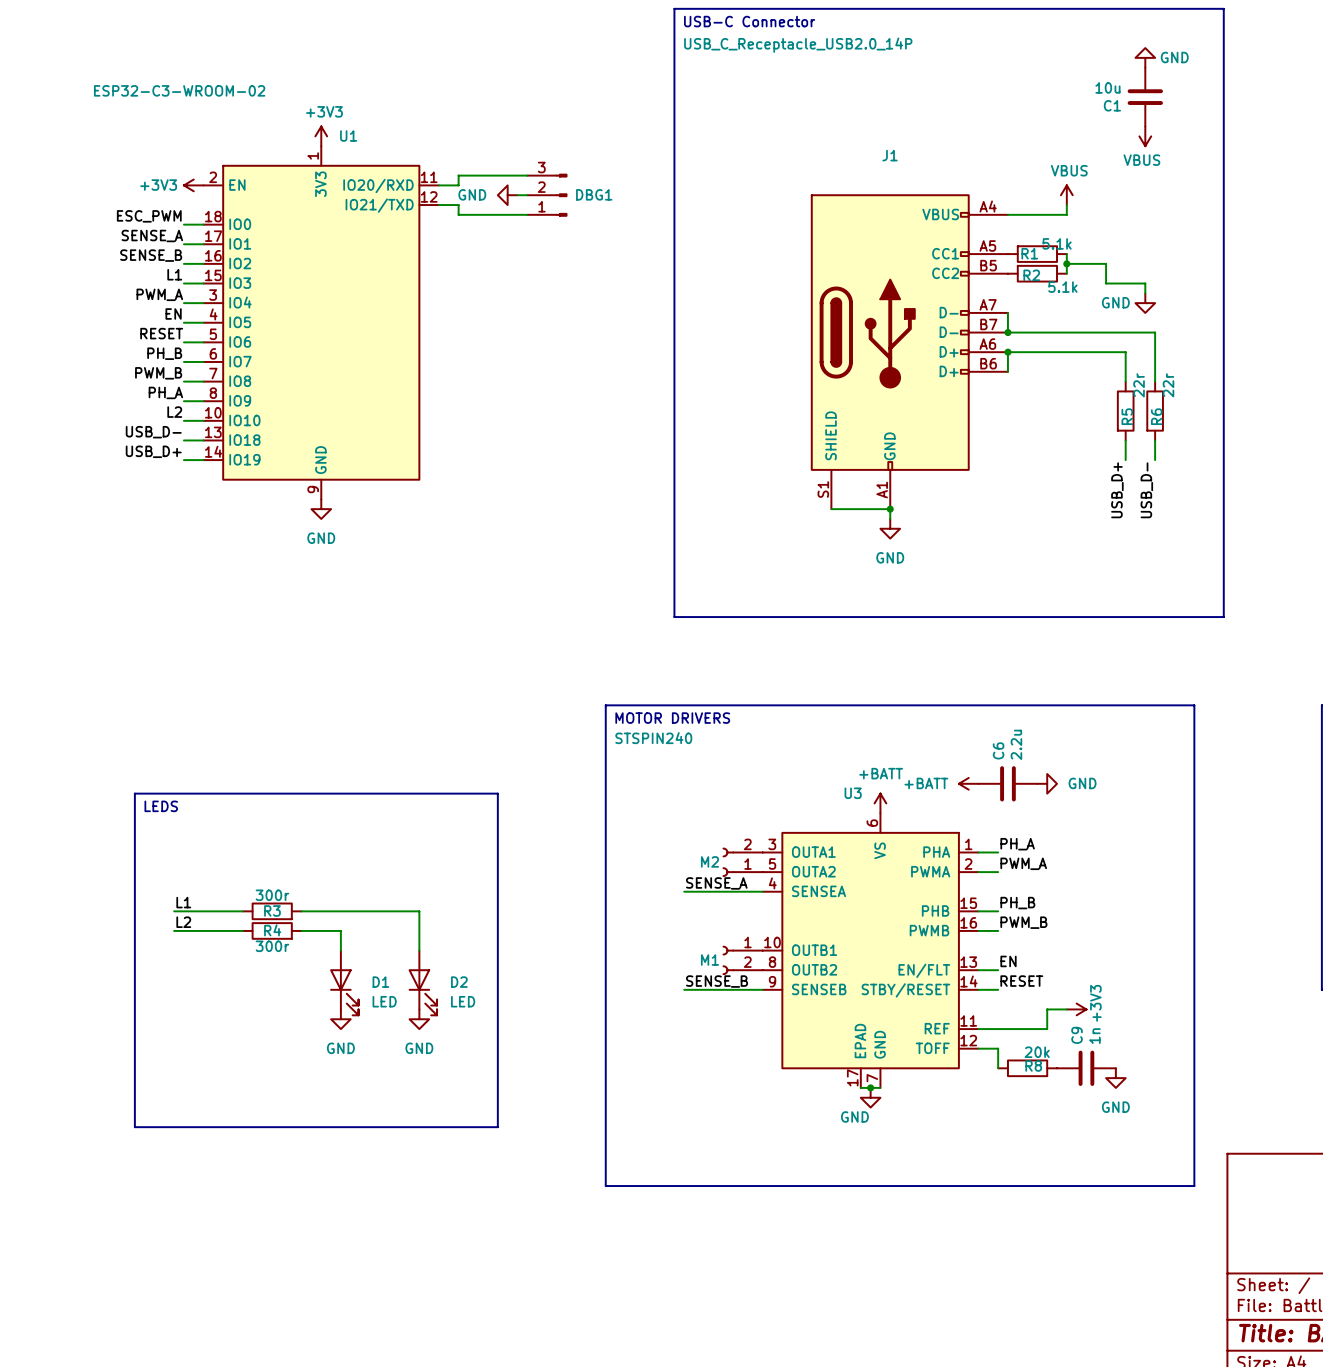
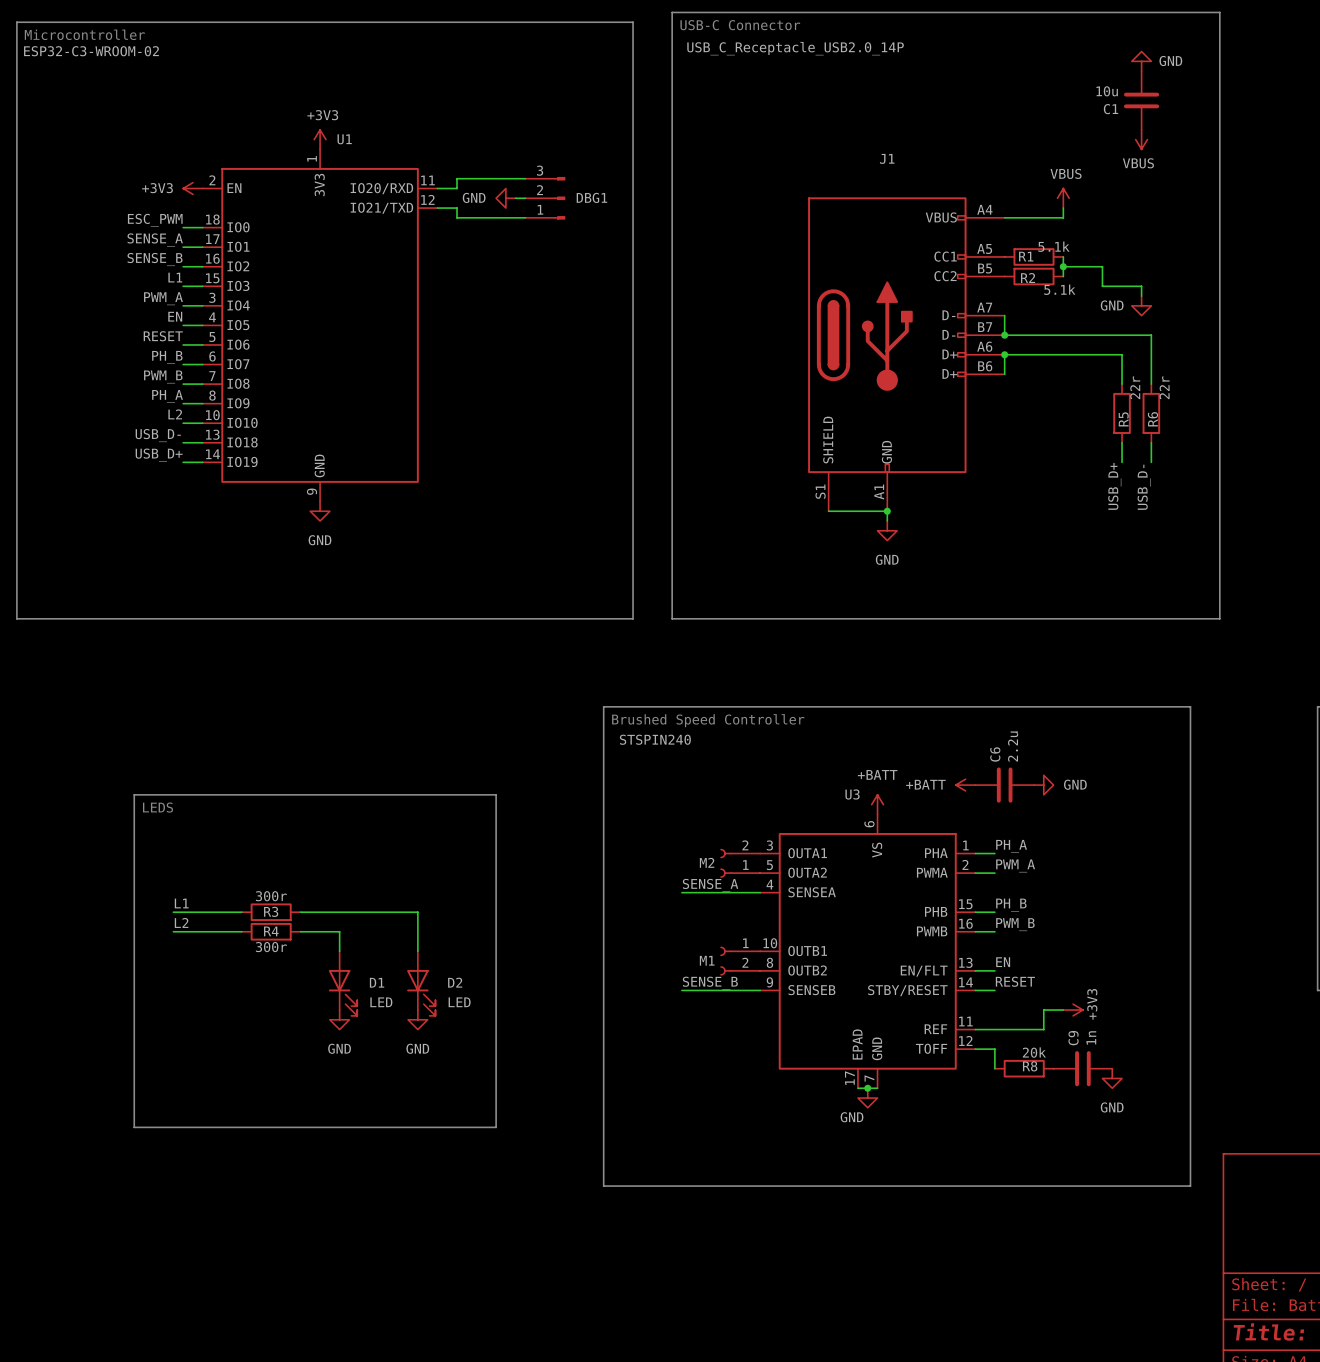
line: none -> (16, 22) (633, 22) (633, 618) (16, 618) (16, 22)
text: none -> Microcontroller (84, 34)
U1 value position: ESP32-C3-WROOM-02 (179, 90) -> ESP32-C3-WROOM-02 (91, 51)
text: MOTOR DRIVERS (672, 718) -> Brushed Speed Controller (708, 720)

